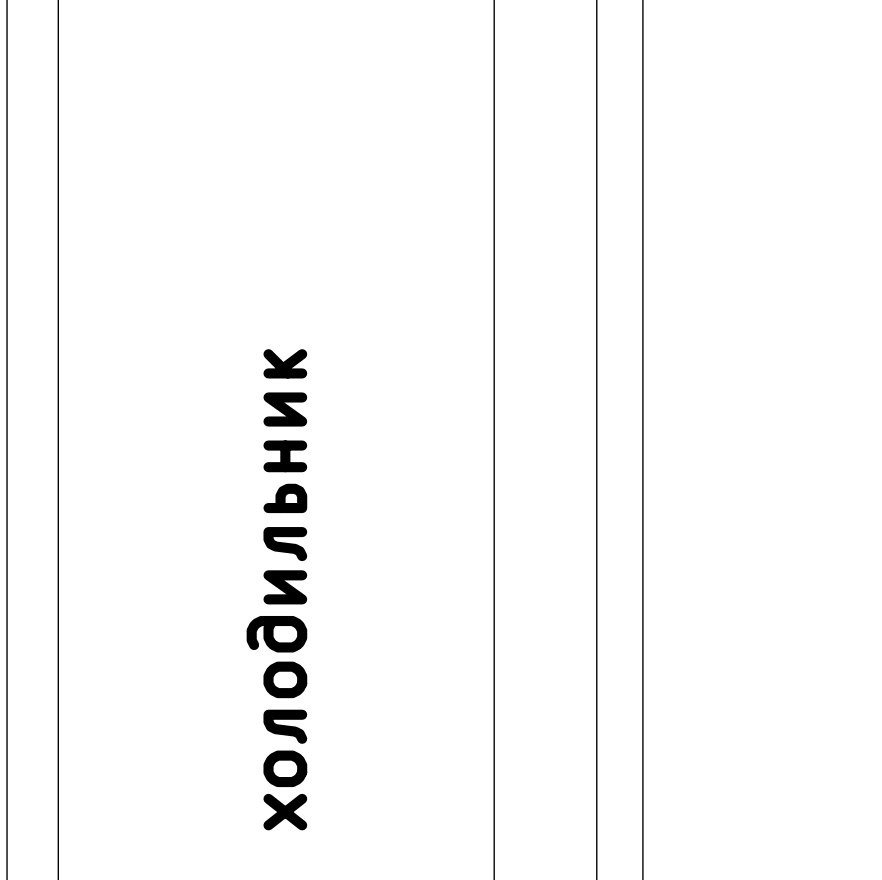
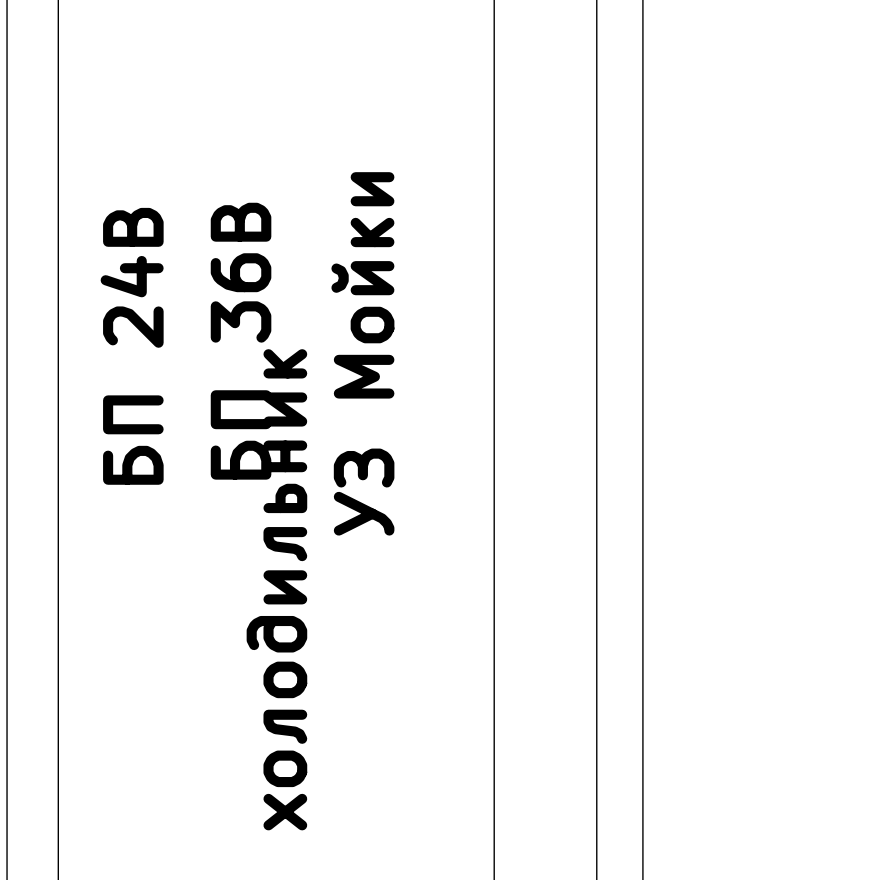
text: none -> БП 36В (241, 341)
text: none -> БП 24В (132, 346)
text: none -> УЗ Мойки (362, 353)

